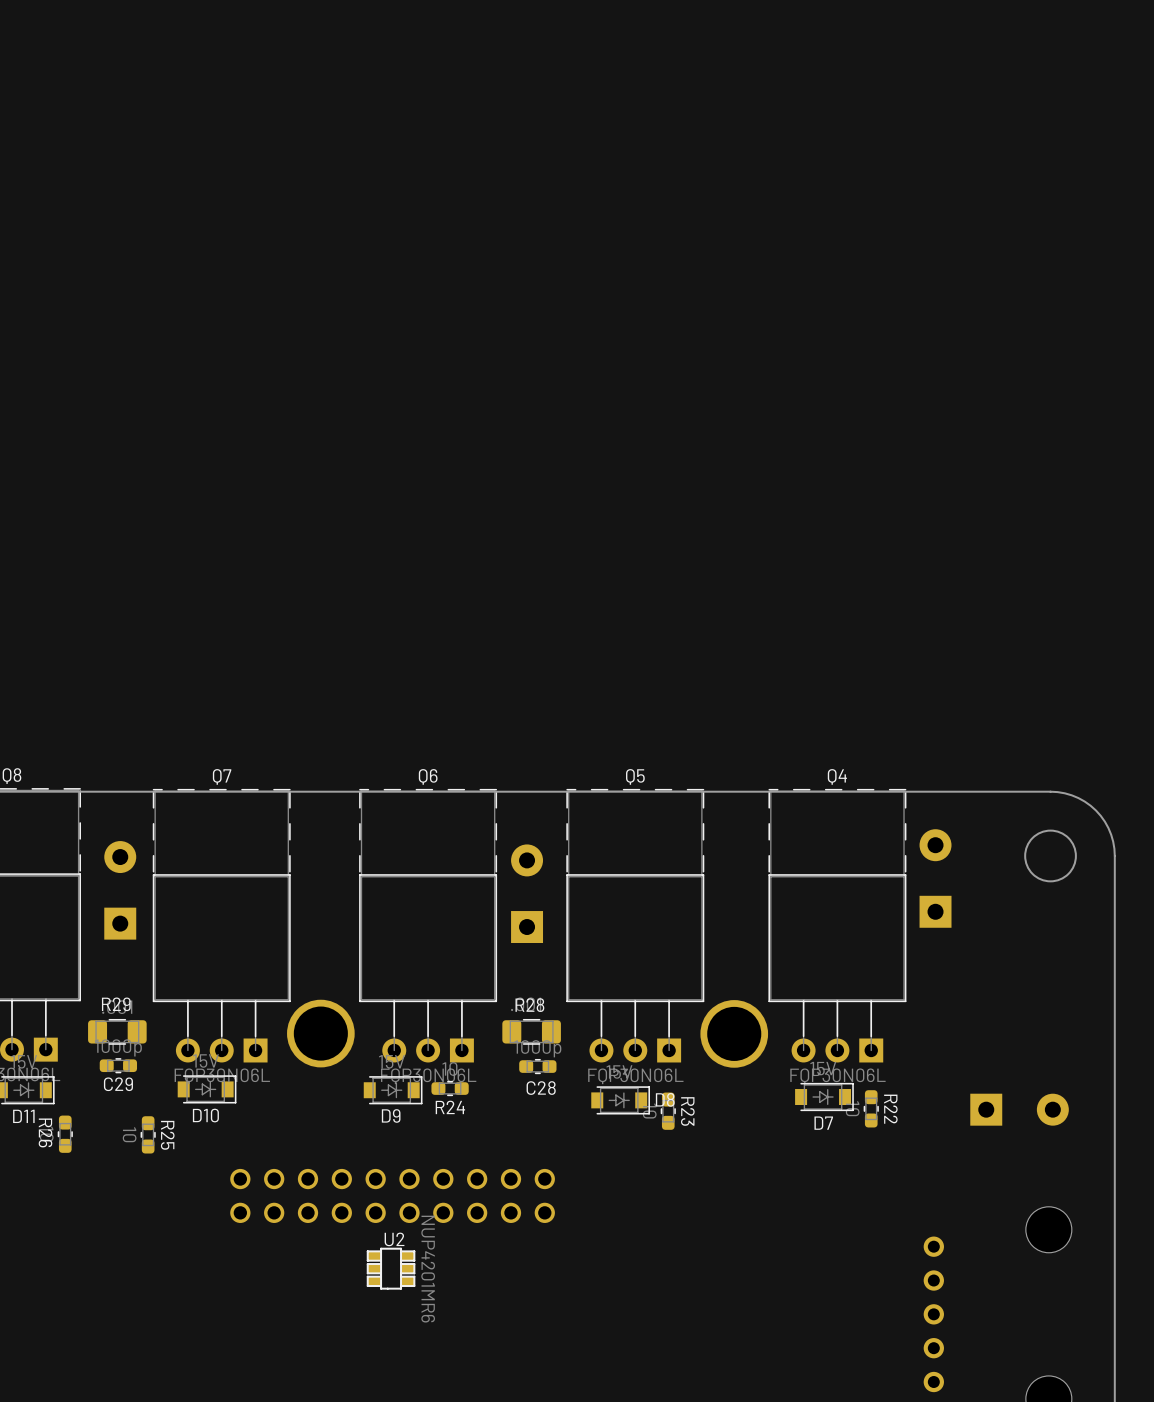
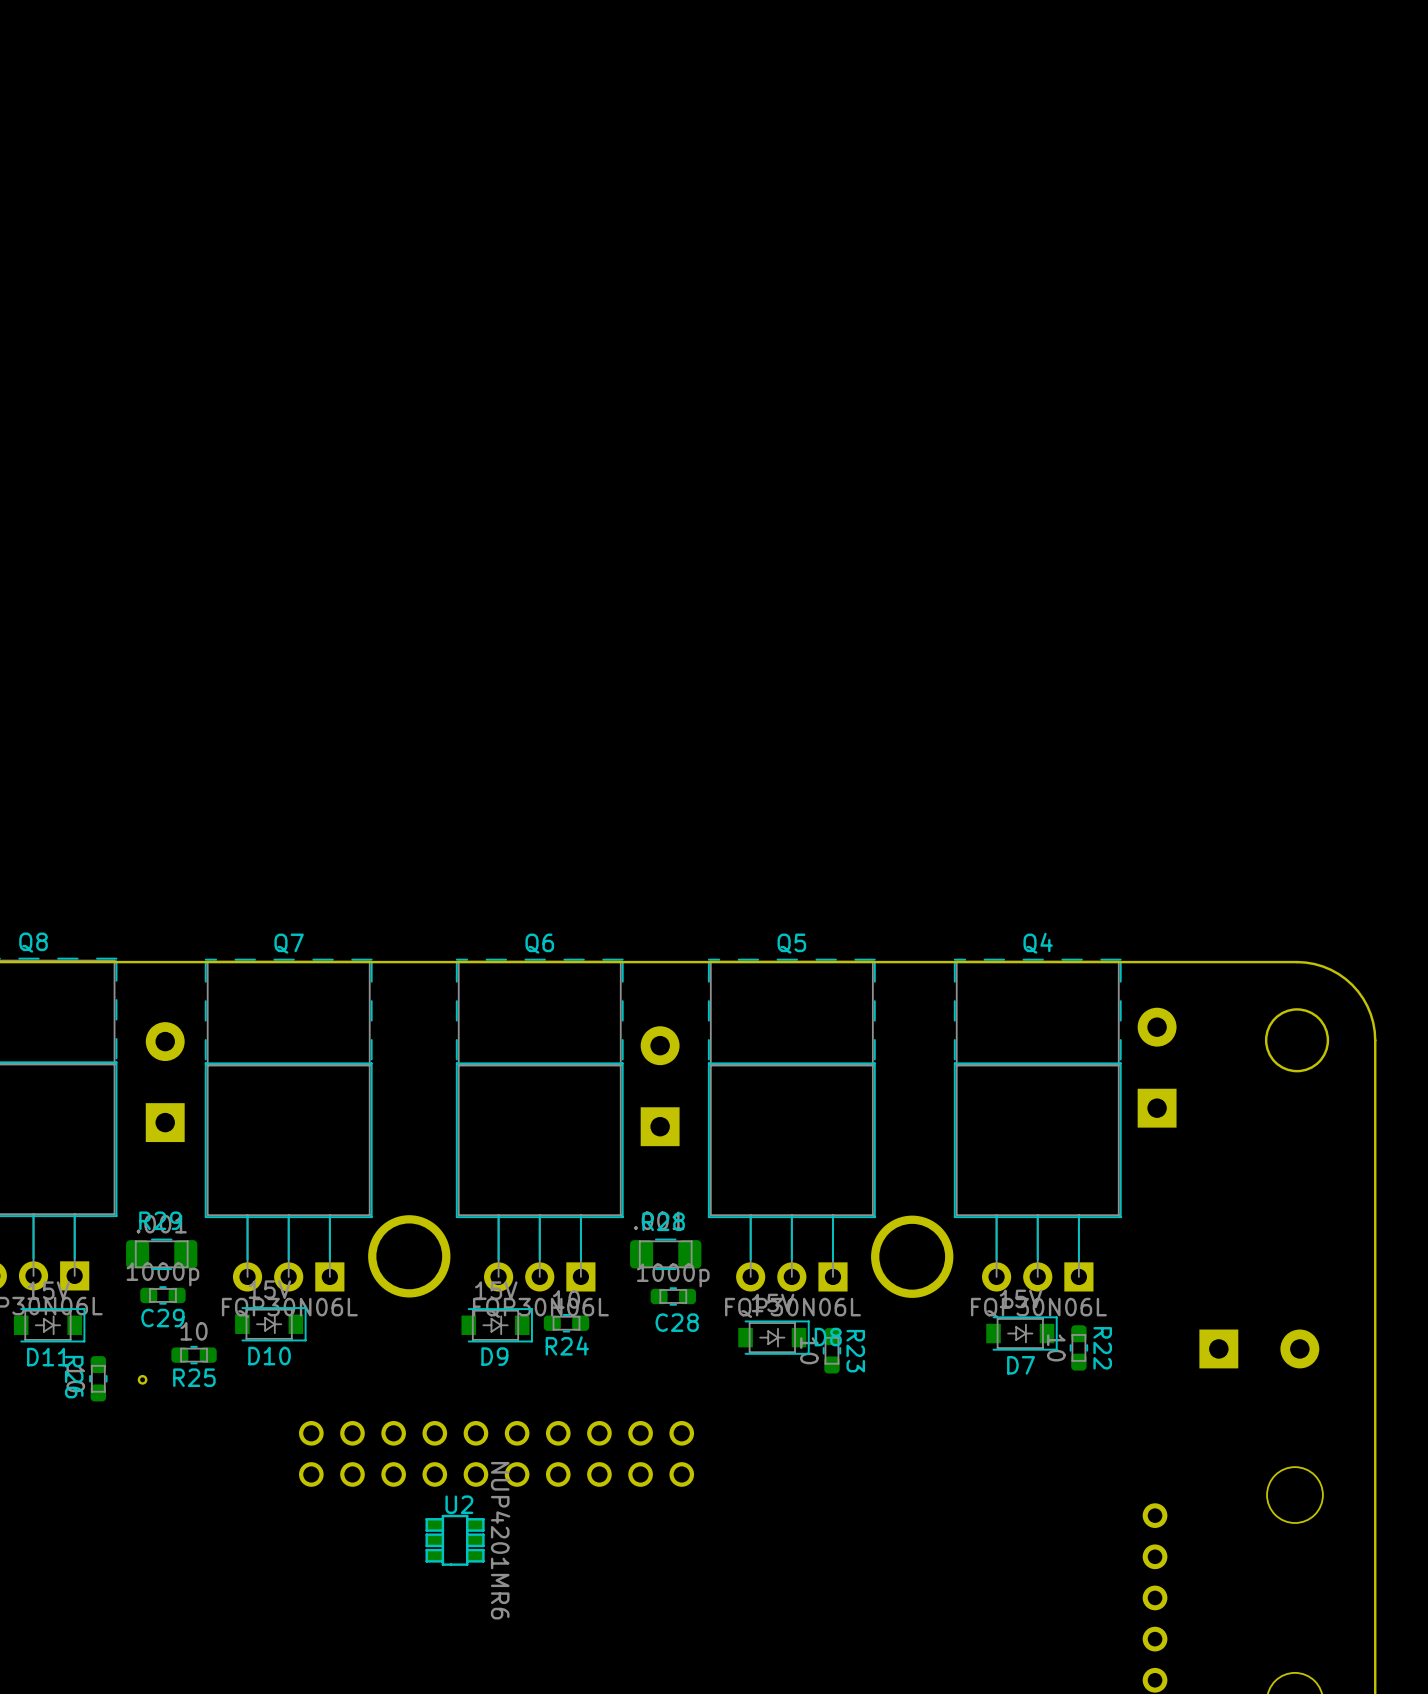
R25 rotation: 0° (148, 1134) -> 90° clockwise (194, 1355)
part: none -> (142, 1379)
U2 position: (391, 1268) -> (455, 1540)

